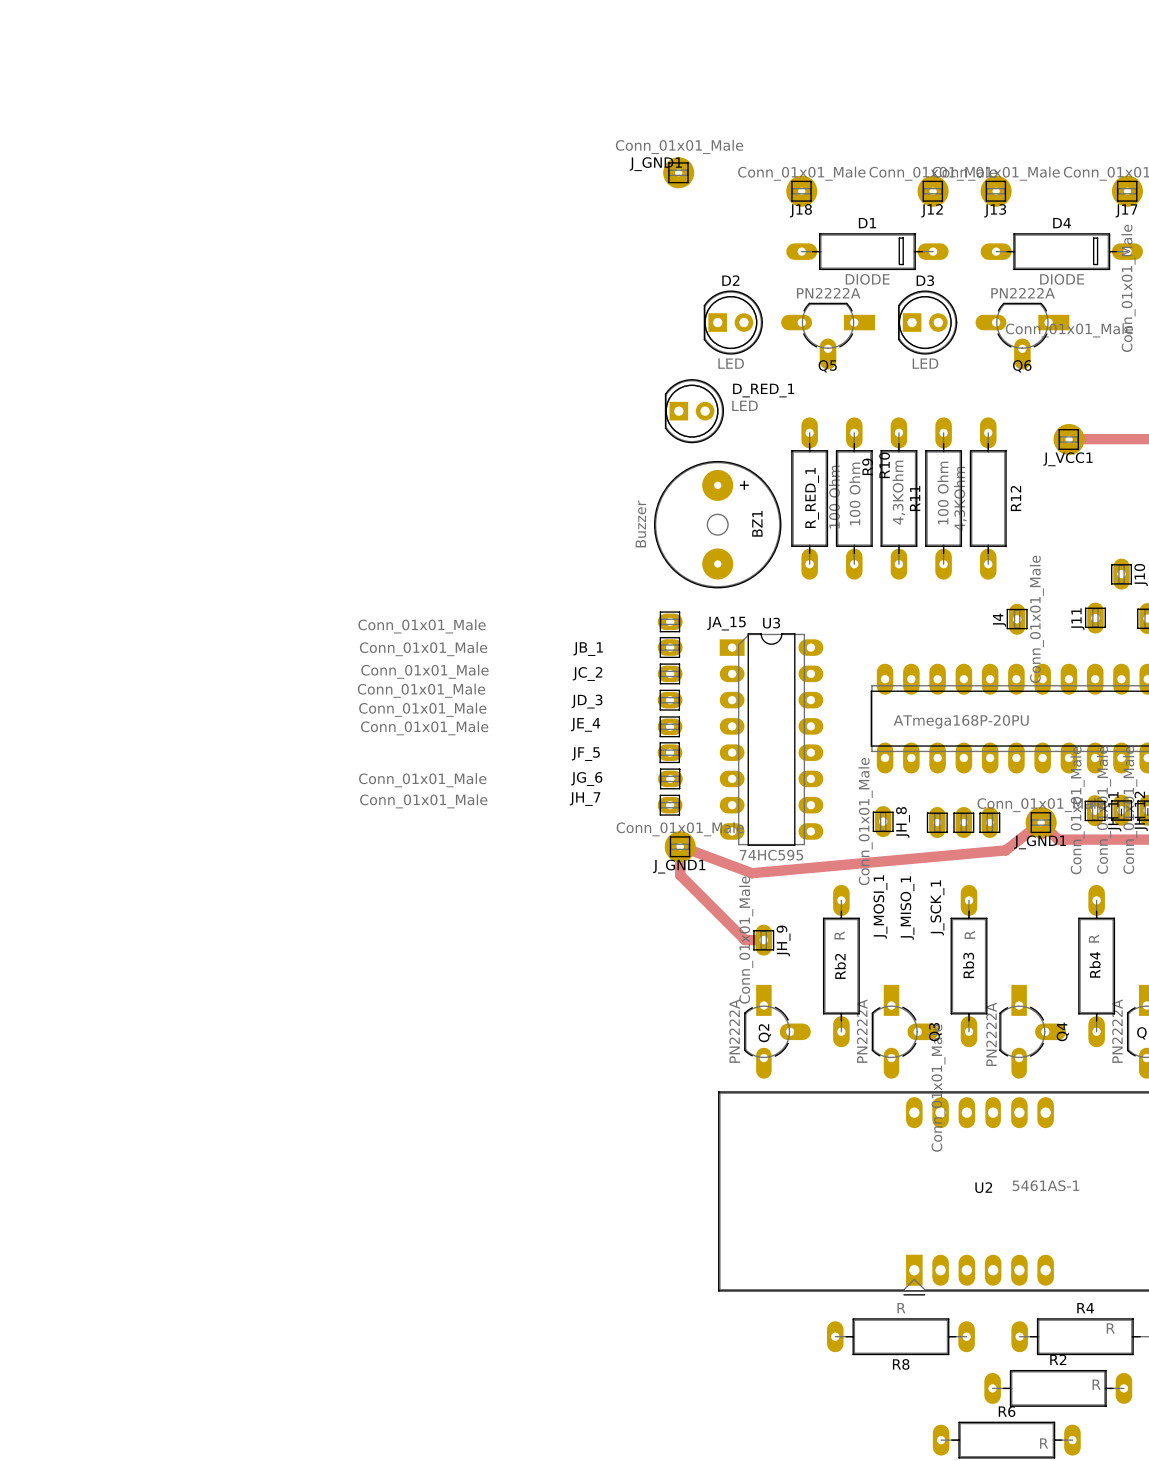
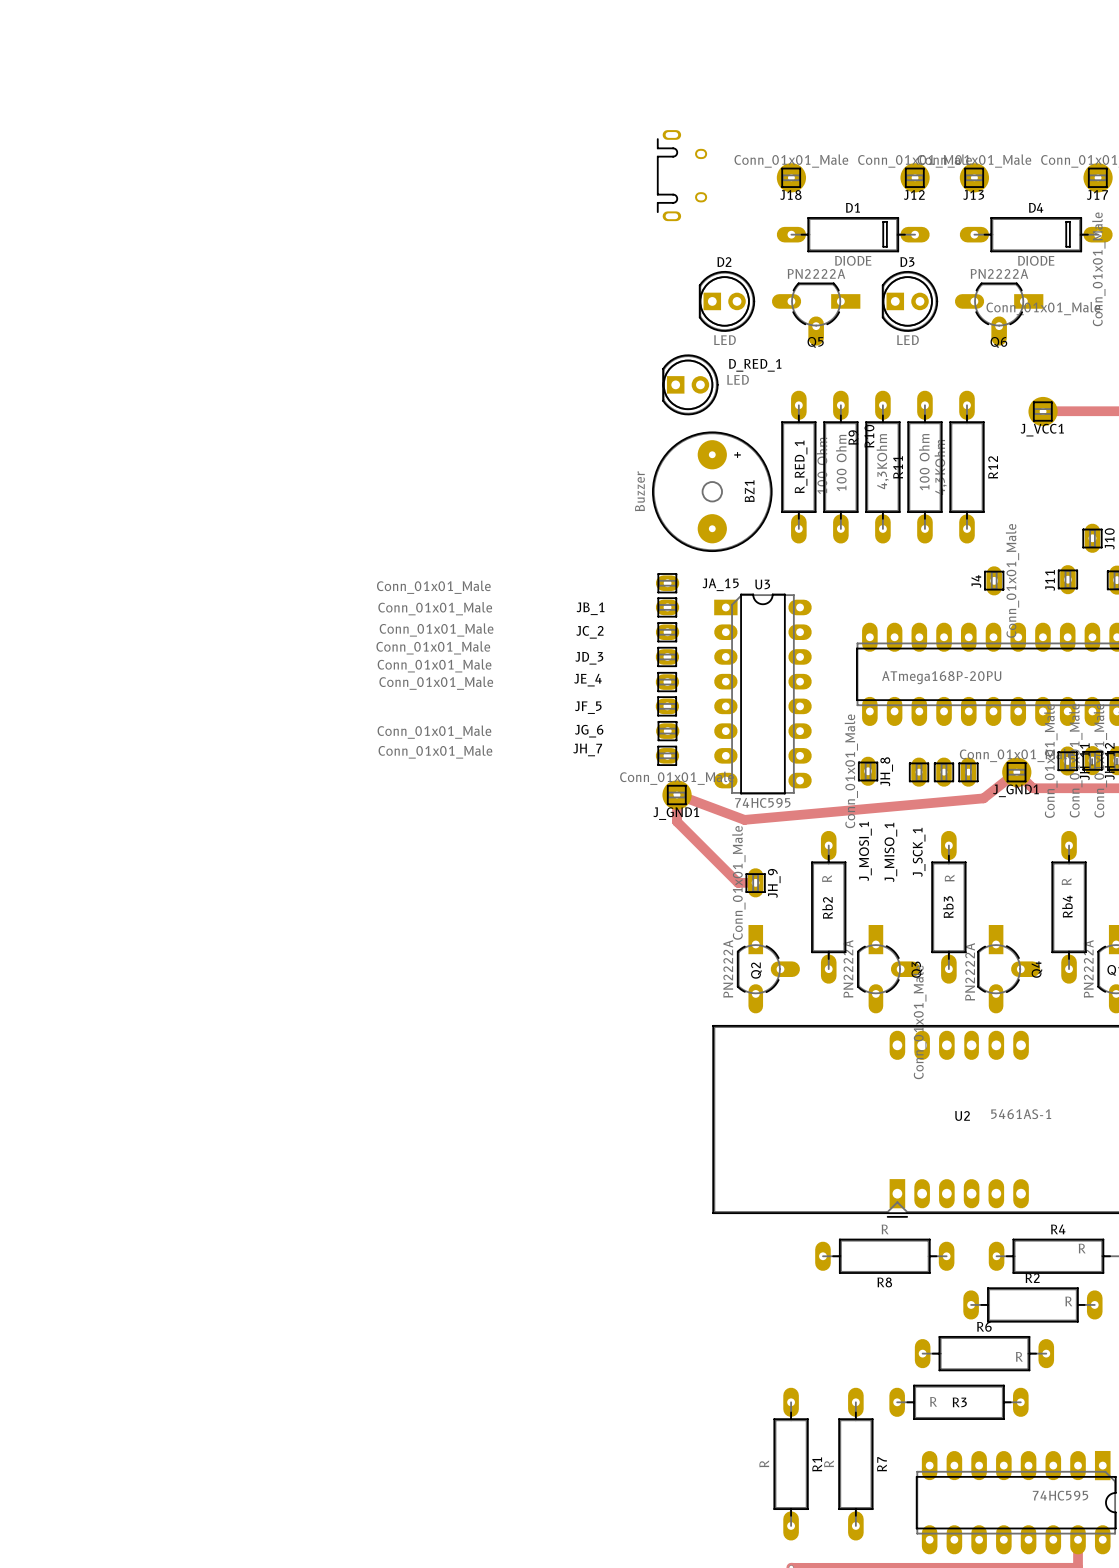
J_GND1: Conn_01x01_Male (678, 172) -> none
part: none -> (682, 175)

